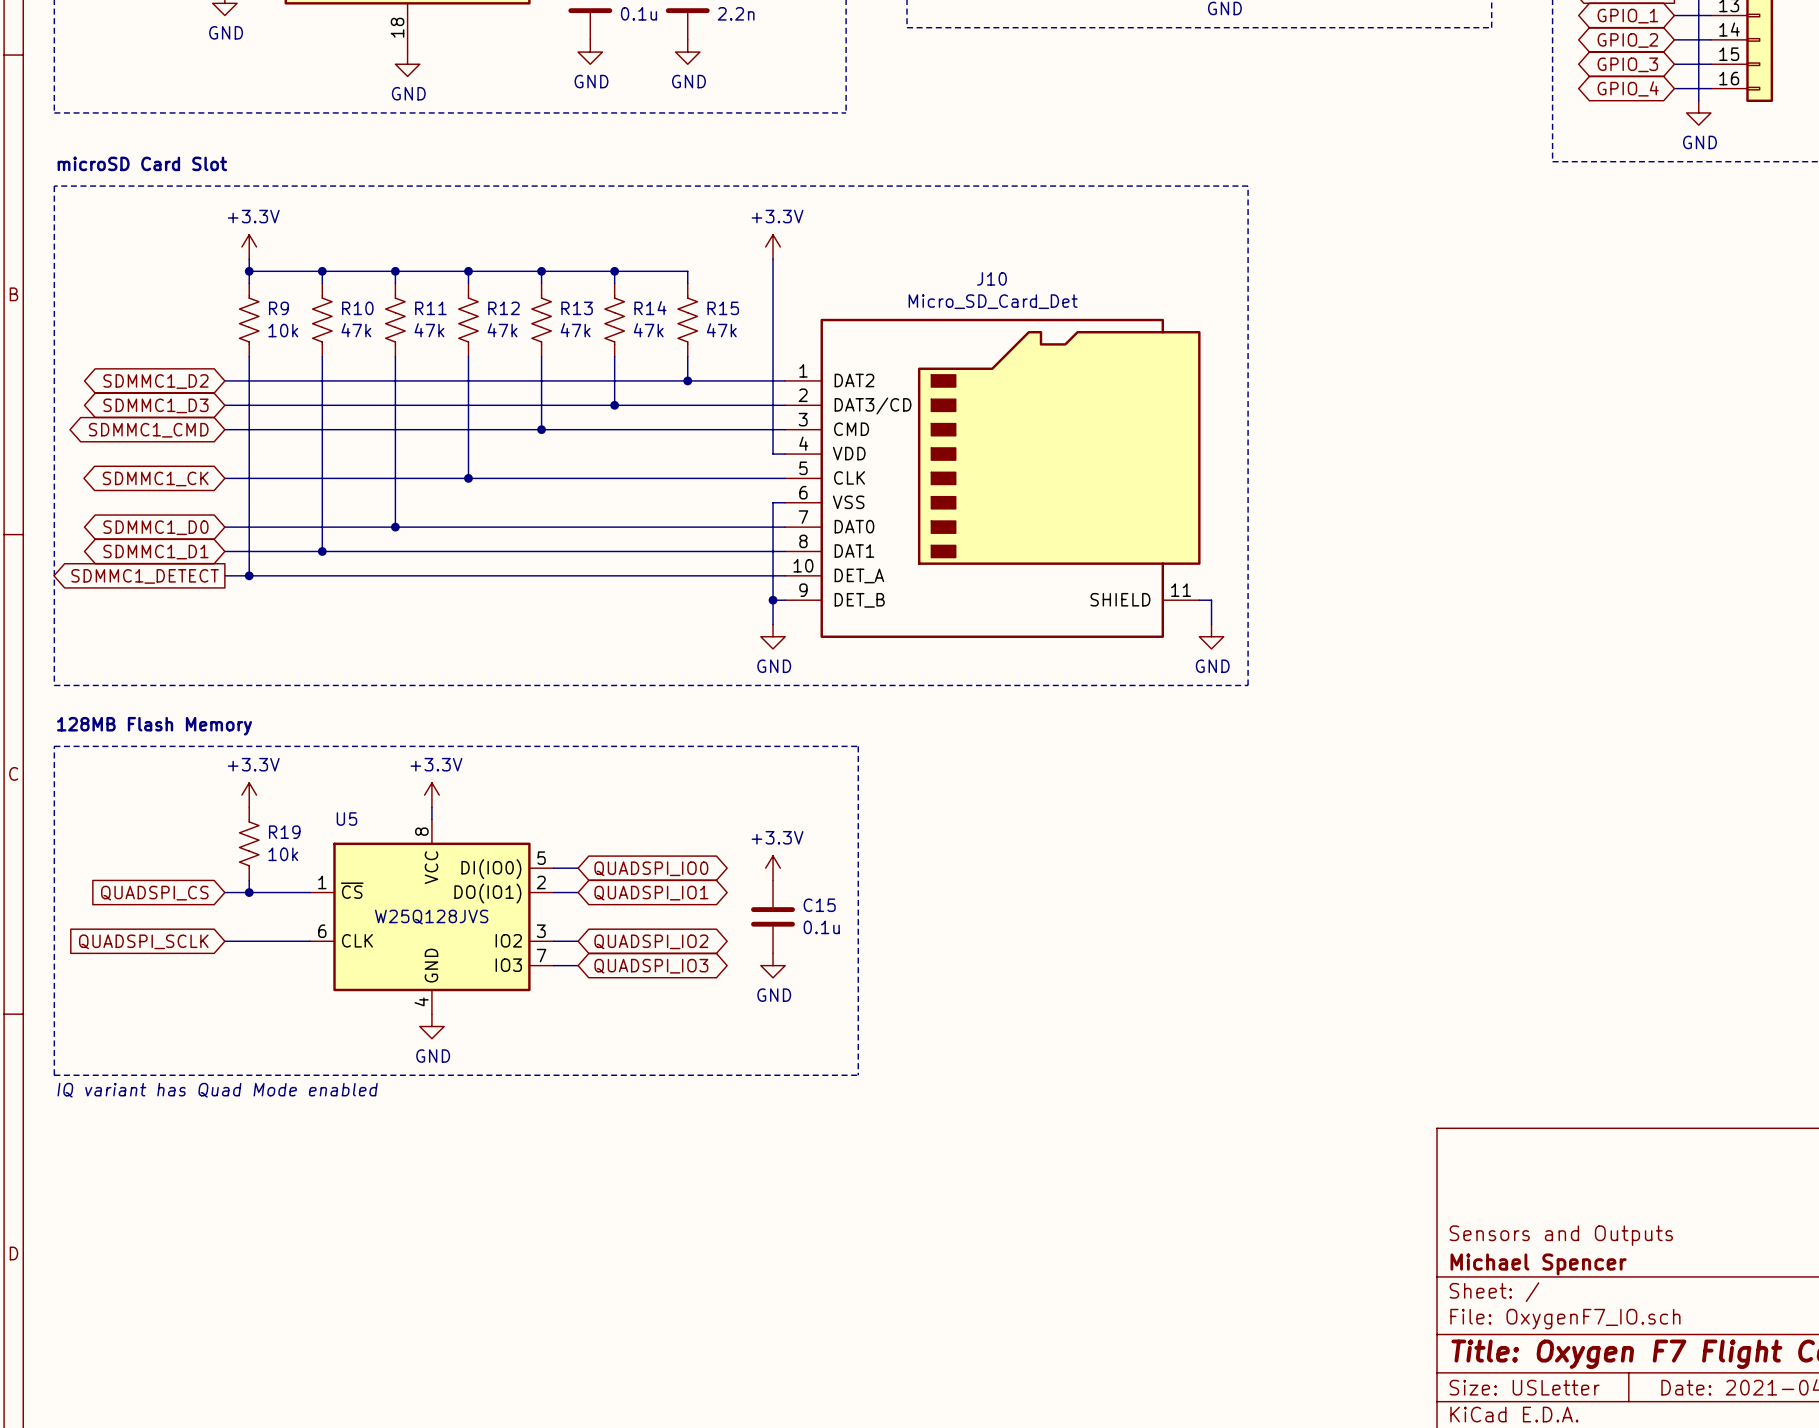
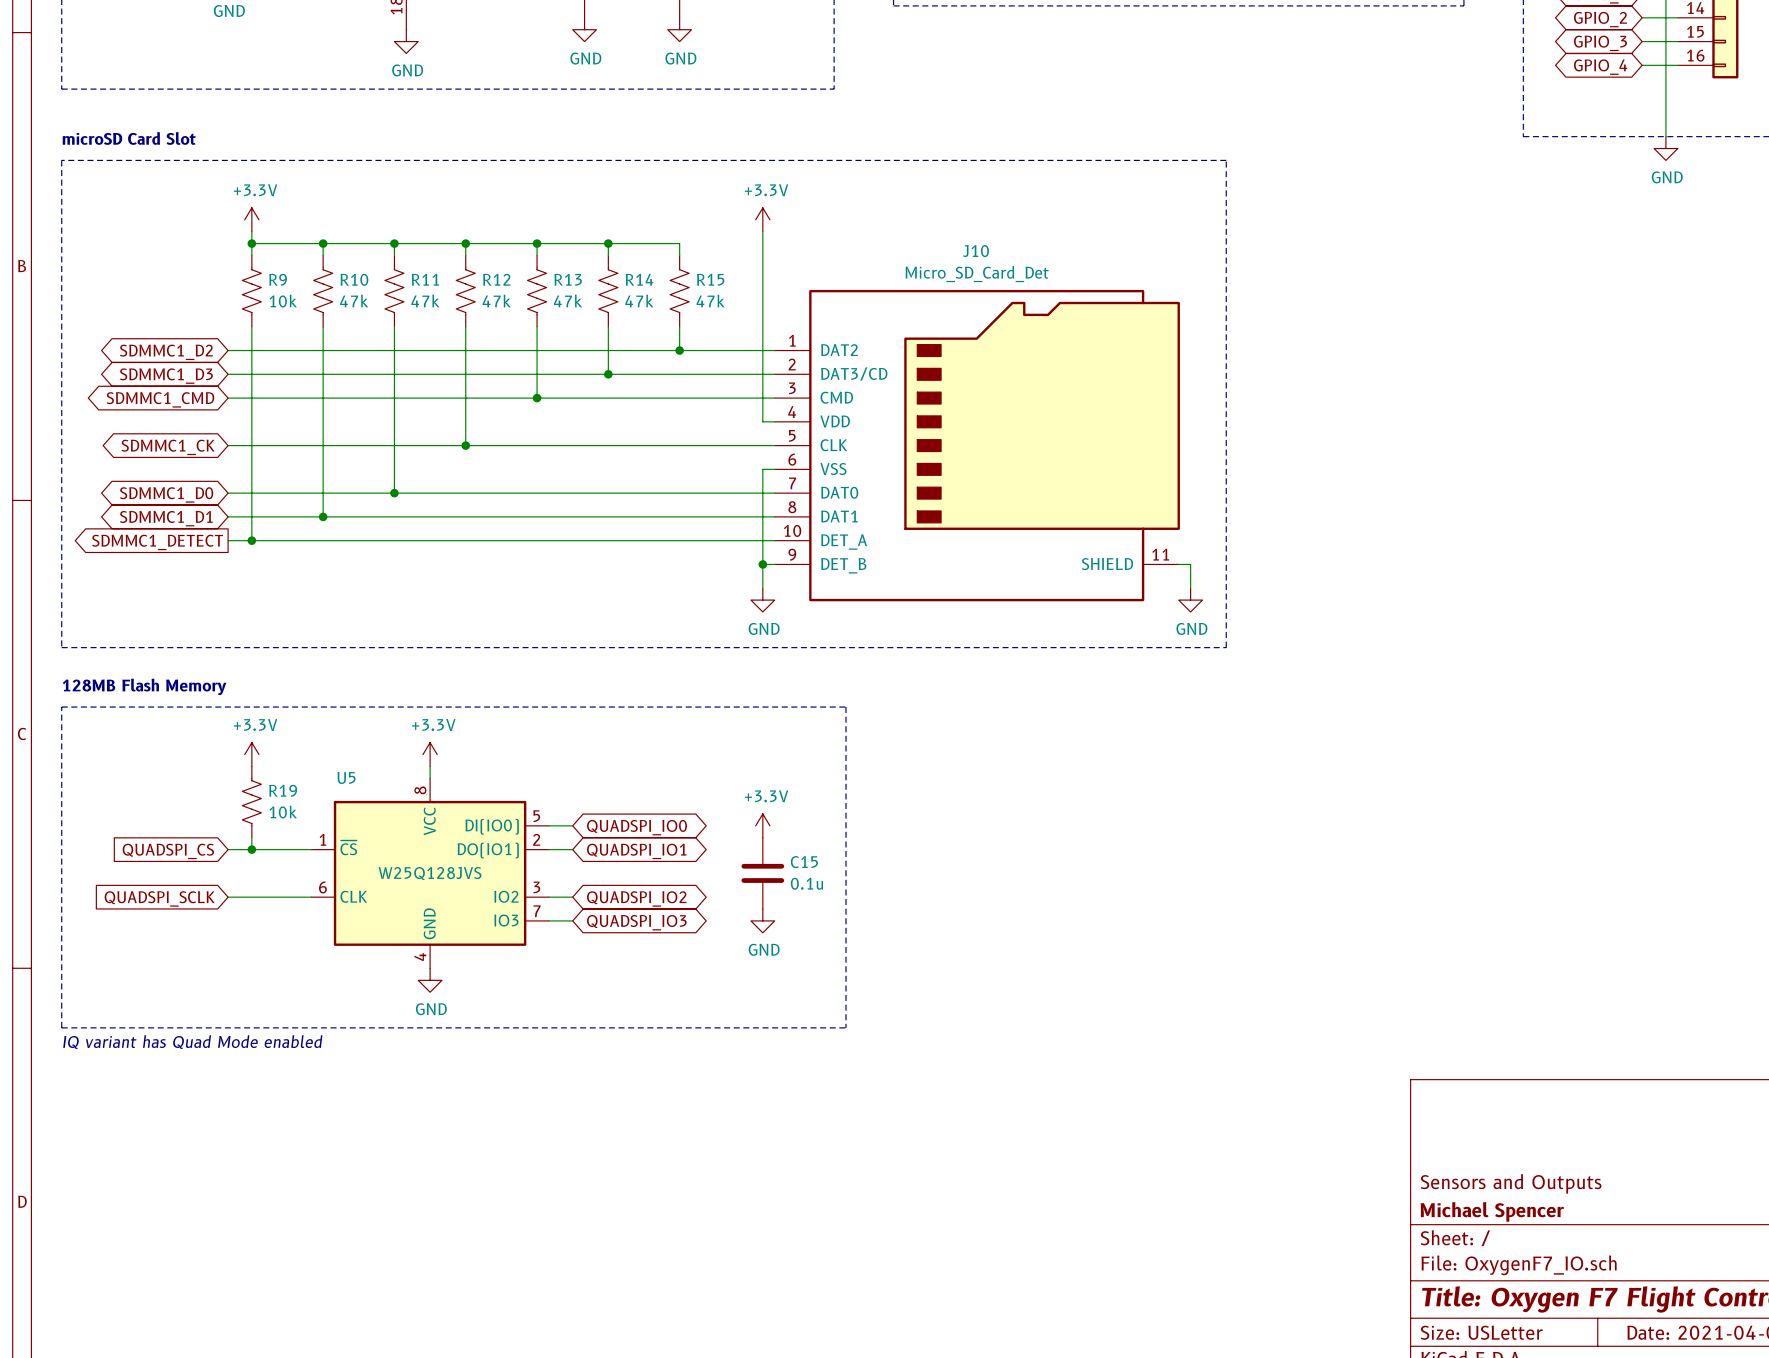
wire: none -> (1665, 77) (1665, 136)
power symbol position: GND (1698, 112) -> GND (1665, 148)

